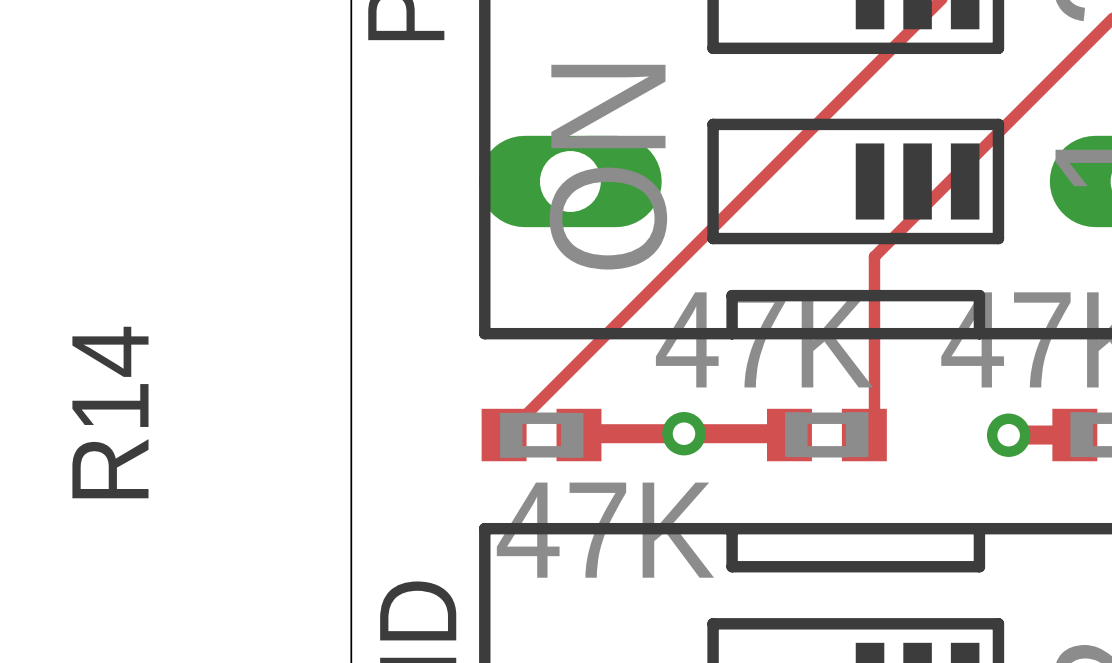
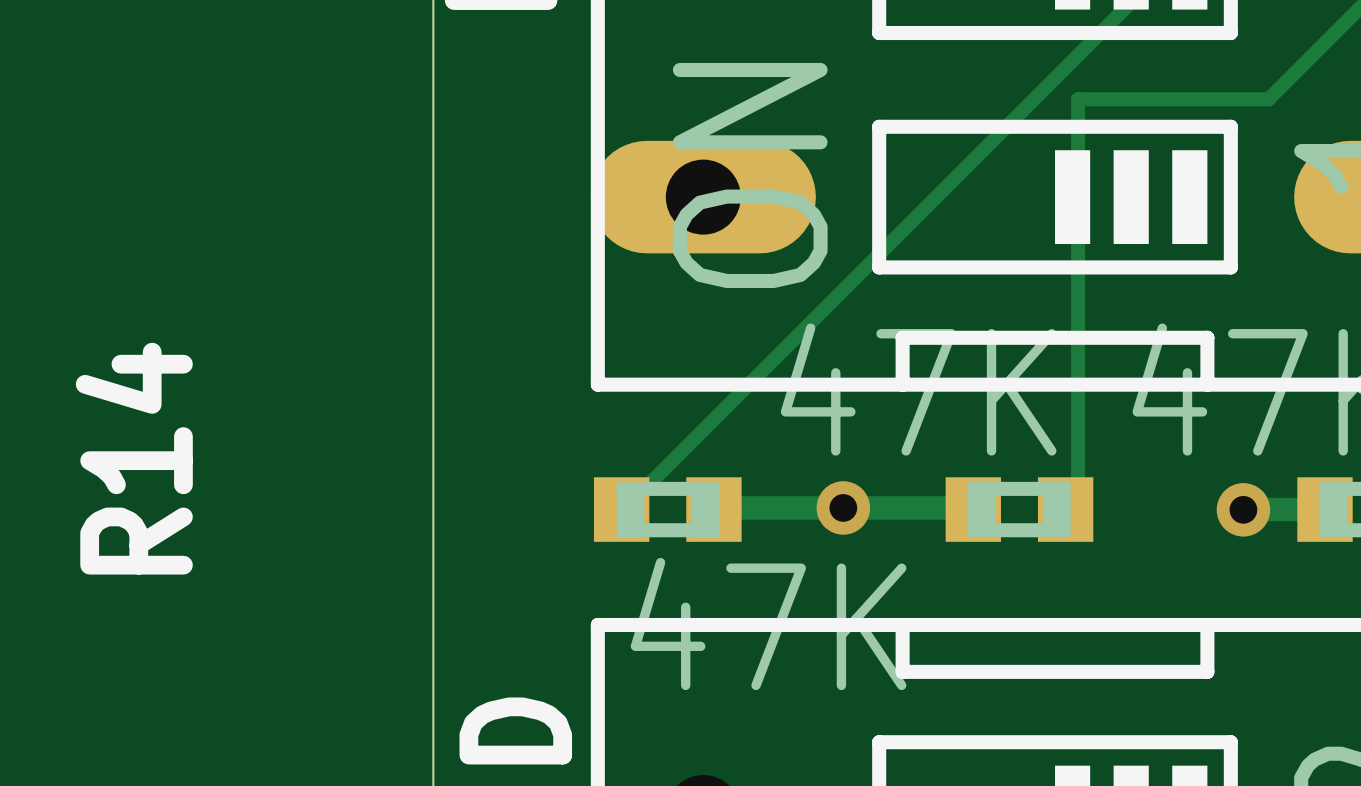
track: (1029, 102) (874, 256) -> (1268, 99) (1078, 99) (1078, 289)

